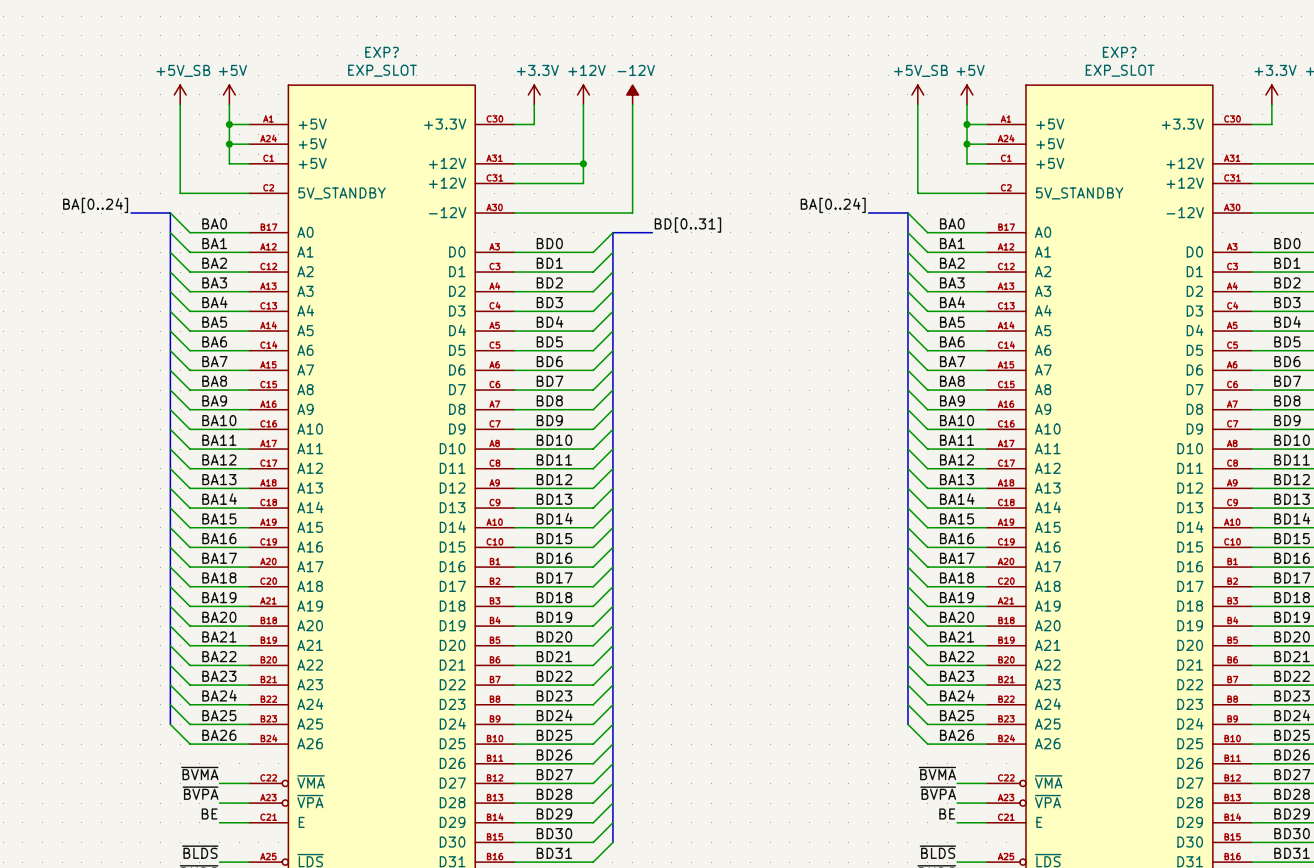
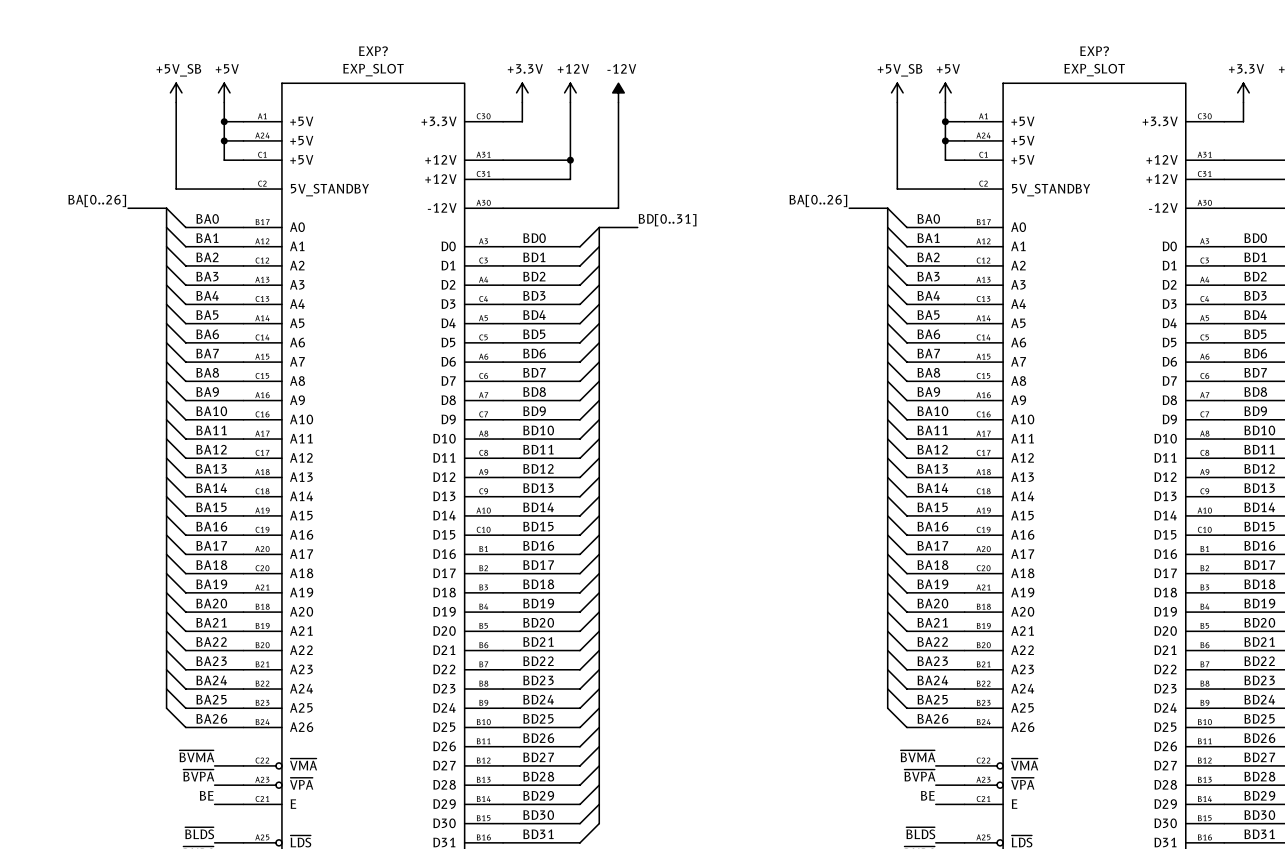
label: BA[0..24] (95, 205) -> BA[0..26] (97, 201)
label: BA[0..24] (833, 205) -> BA[0..26] (818, 201)

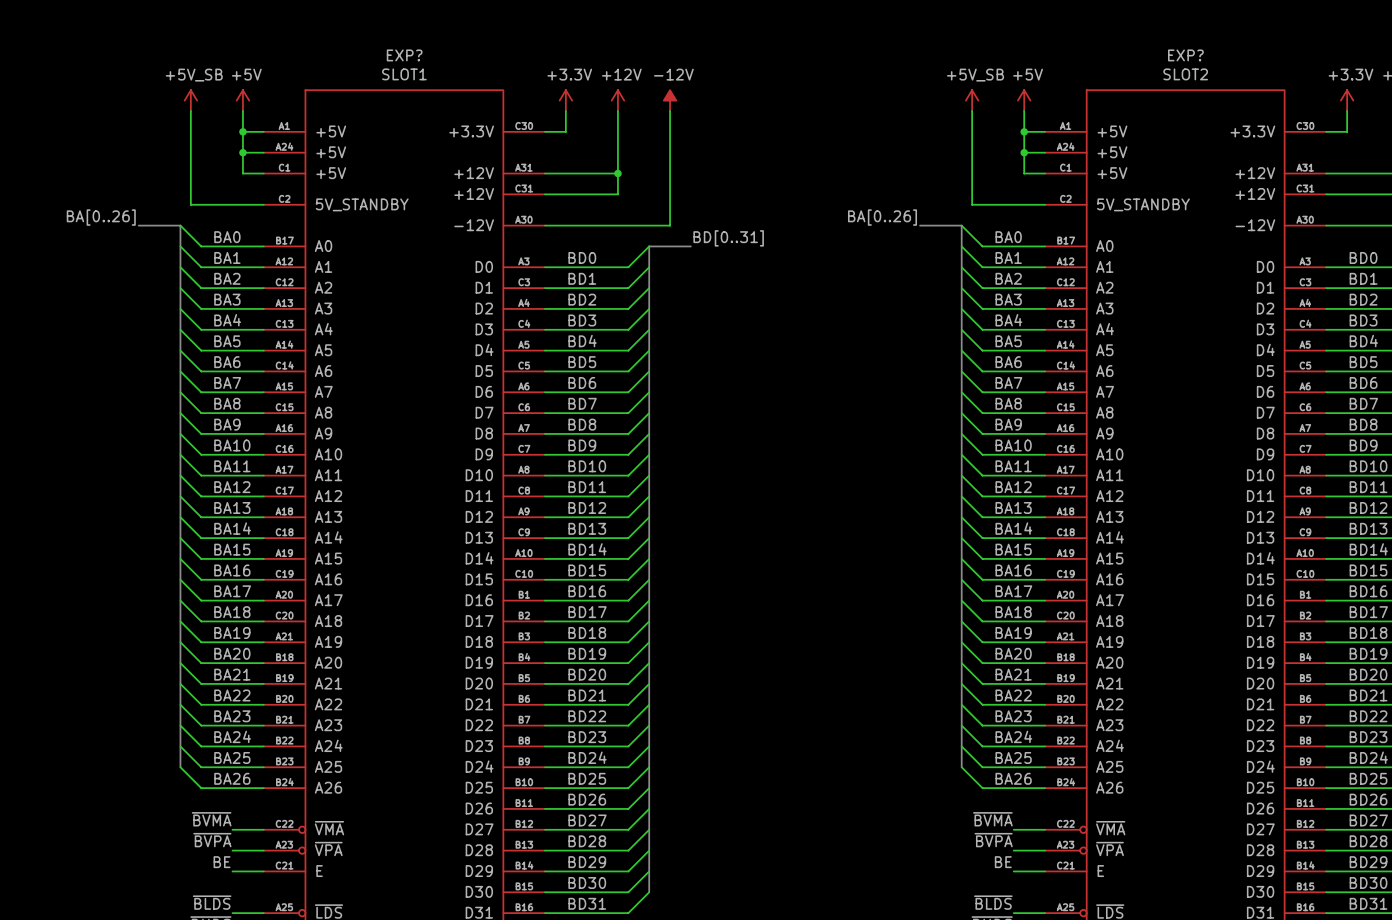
EXP? value: EXP_SLOT (373, 70) -> SLOT1 (404, 74)
EXP? value: EXP_SLOT (1094, 70) -> SLOT2 (1185, 74)

